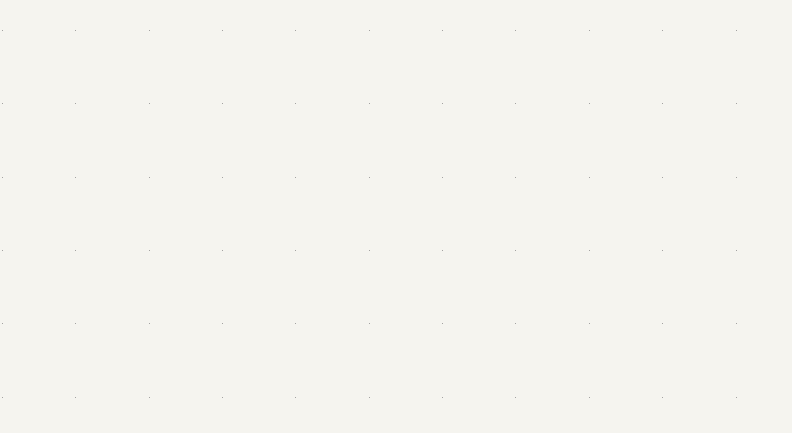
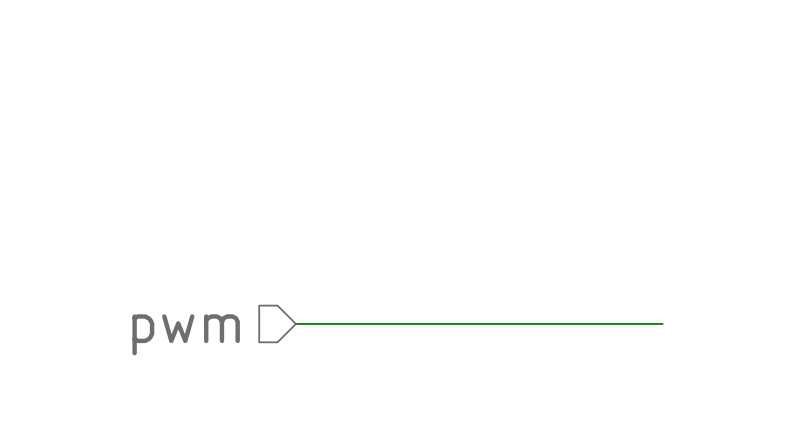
wire: none -> (295, 323) (662, 323)
hierarchical label: none -> pwm (186, 334)

